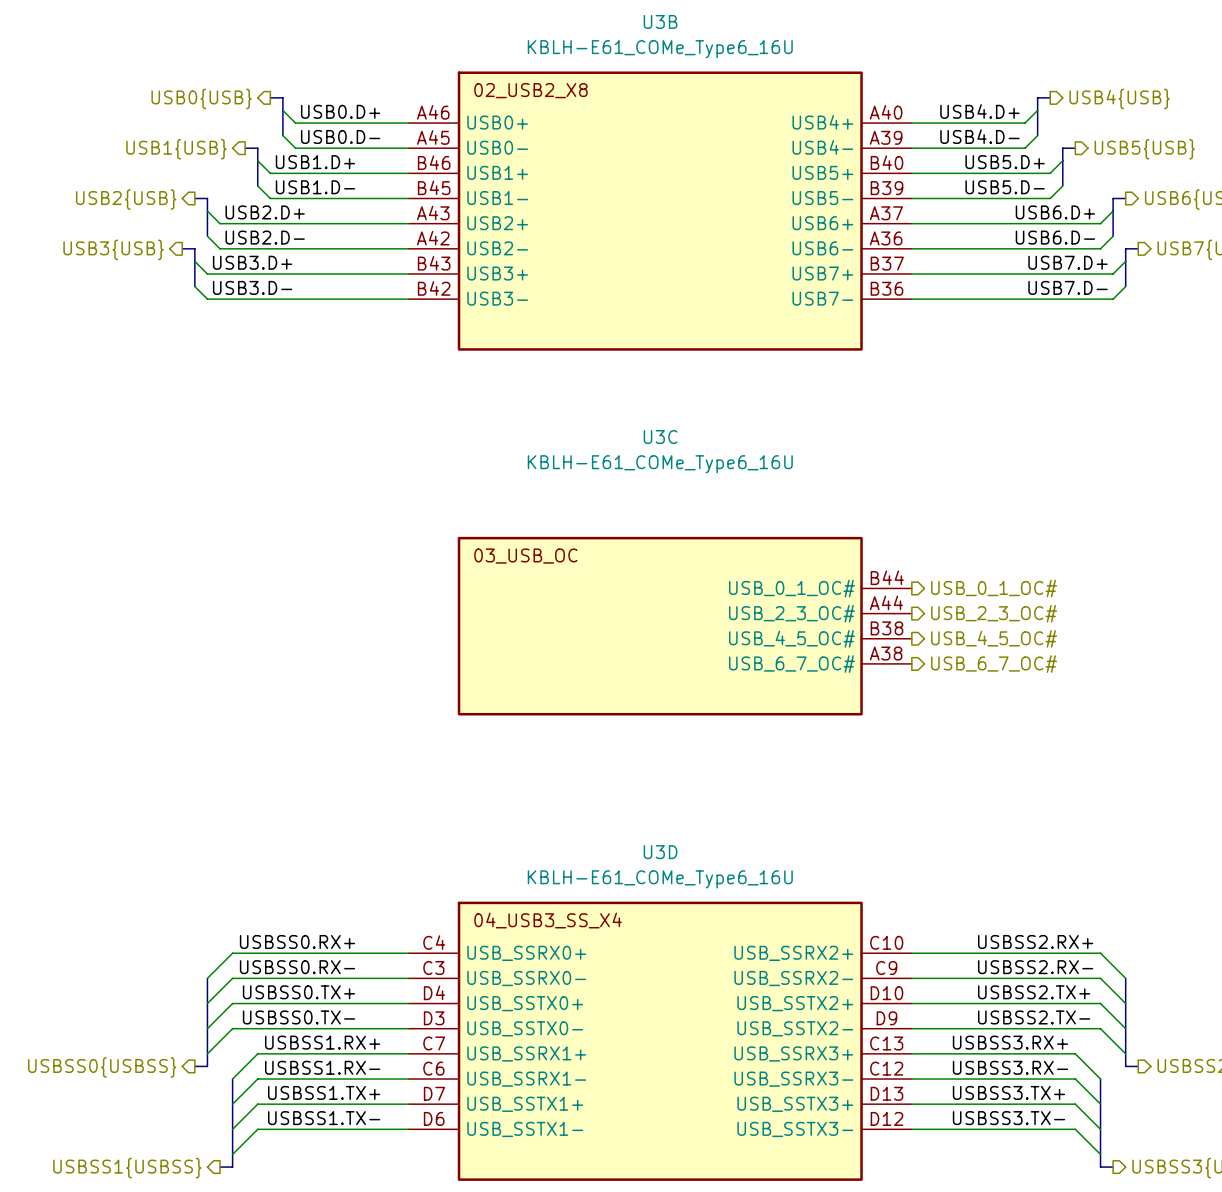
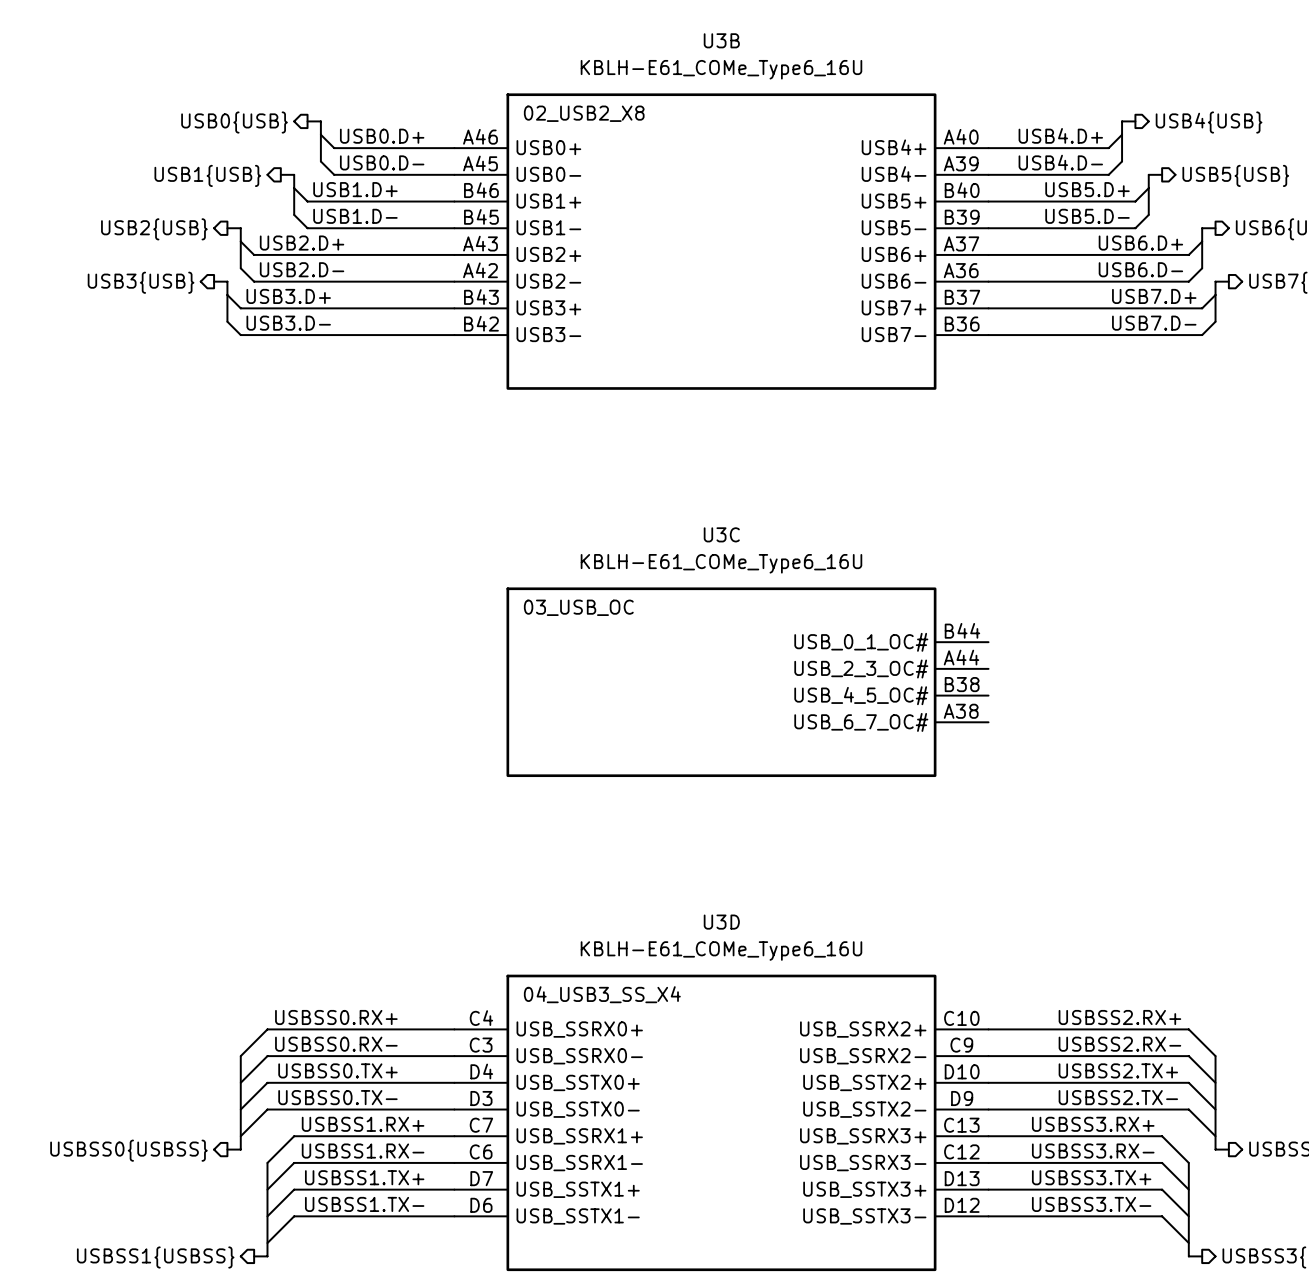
U3C name position: U3C (660, 437) -> U3C (721, 534)
U3C value position: KBLH-E61_COMe_Type6_16U (660, 464) -> KBLH-E61_COMe_Type6_16U (721, 563)
hierarchical label: USB_0_1_OC# (994, 588) -> none
hierarchical label: USB_2_3_OC# (994, 613) -> none
hierarchical label: USB_4_5_OC# (994, 638) -> none
hierarchical label: USB_6_7_OC# (994, 664) -> none

